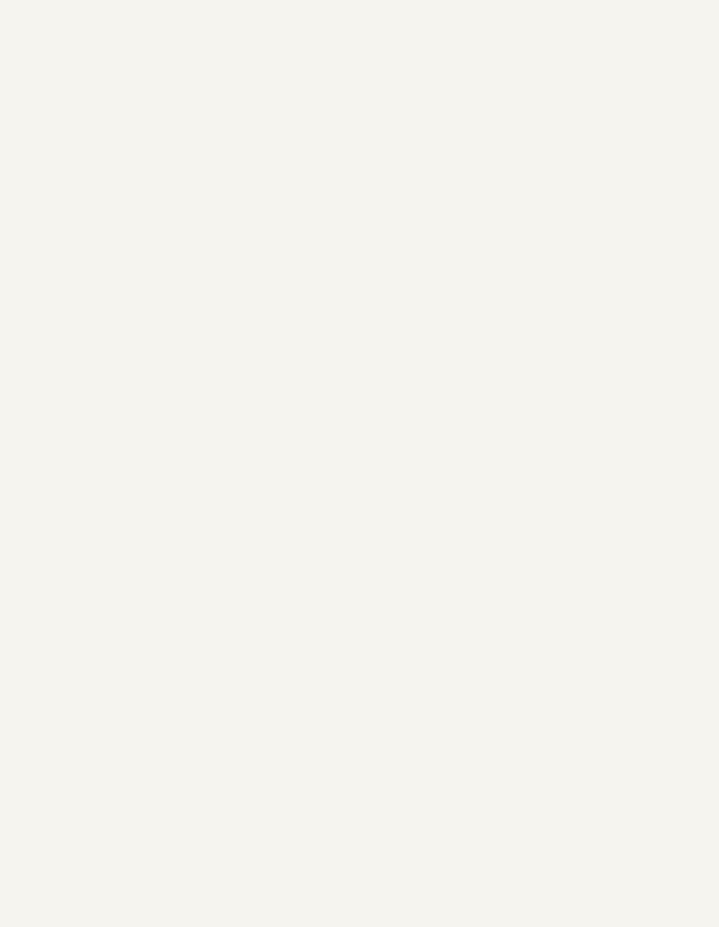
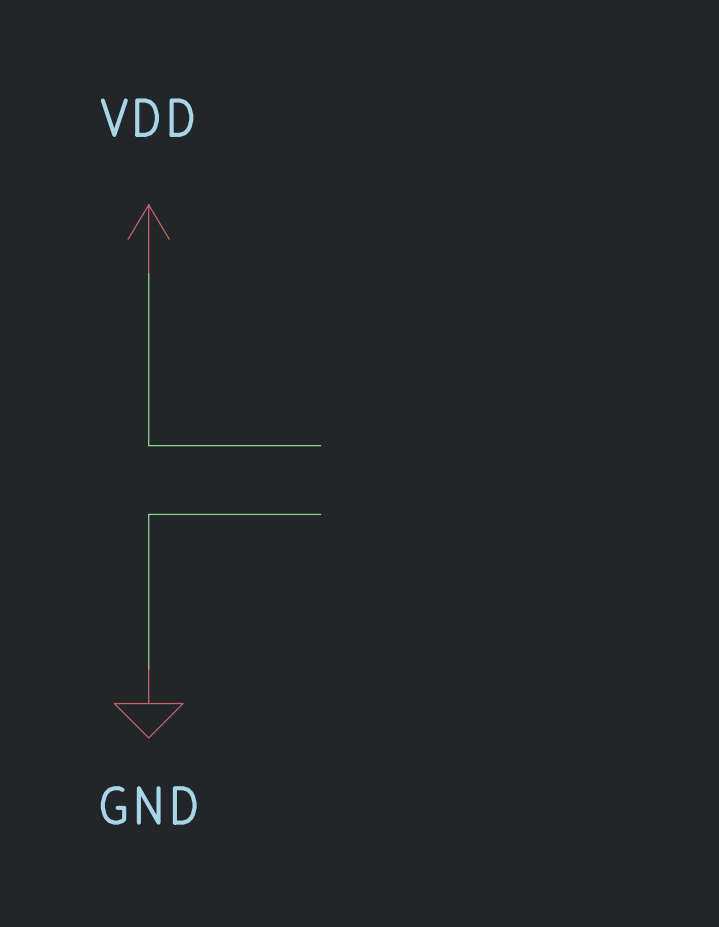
power symbol: none -> VDD (148, 239)
wire: none -> (148, 273) (148, 445) (320, 445)
wire: none -> (320, 514) (148, 514) (148, 669)
power symbol: none -> GND (148, 703)

